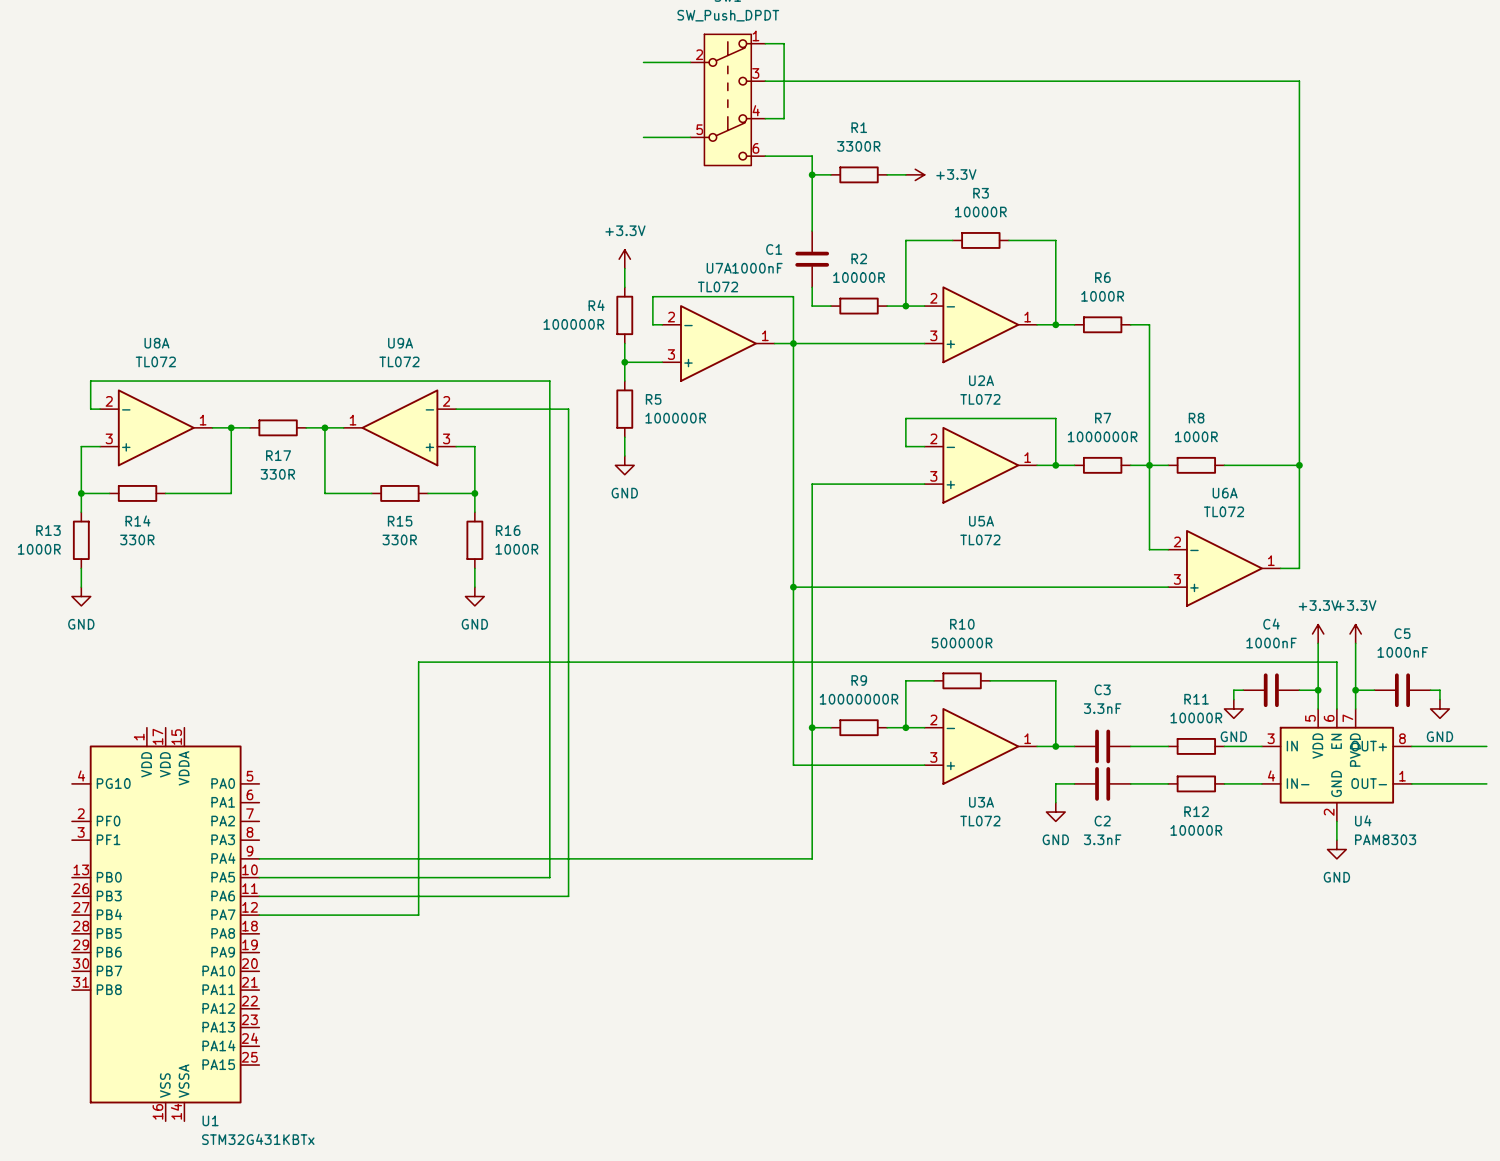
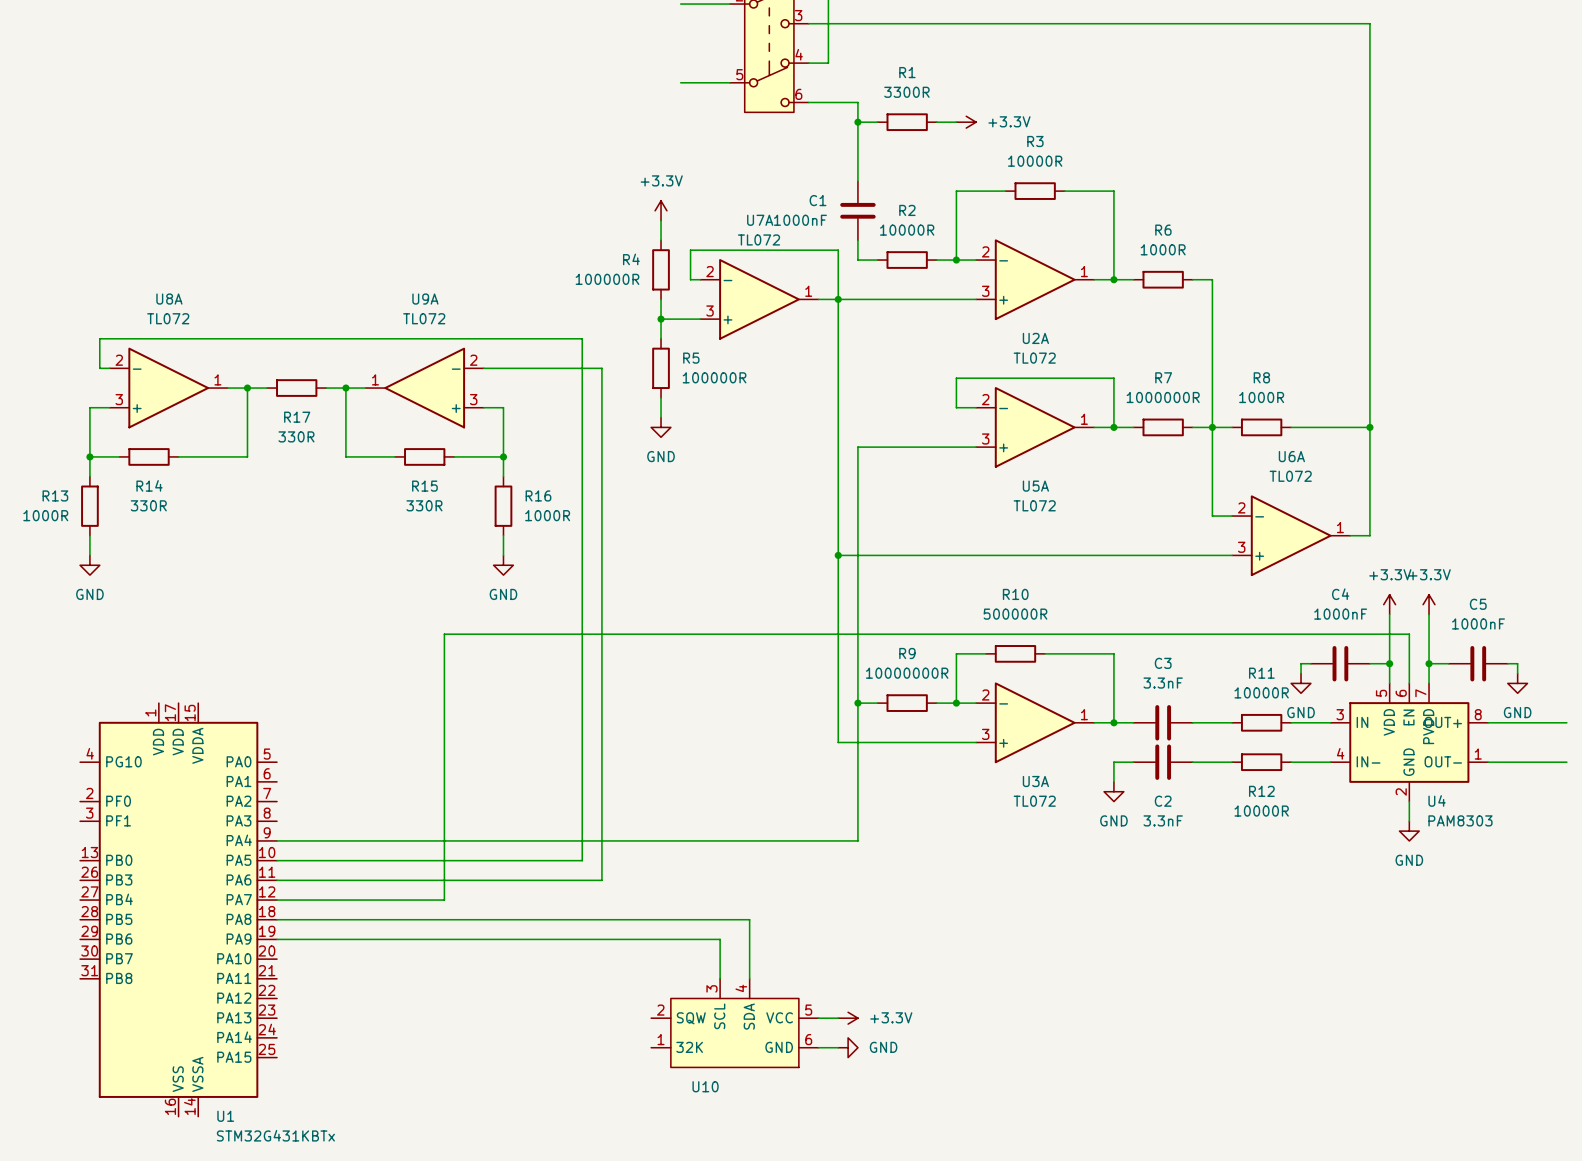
wire: none -> (277, 919) (749, 919) (749, 978)
wire: none -> (277, 939) (720, 939) (720, 978)
wire: none -> (818, 1018) (838, 1018)
power symbol: none -> +3.3V (848, 1018)
U10: none -> (734, 1023)
wire: none -> (818, 1047) (838, 1047)
power symbol: none -> GND (848, 1047)

